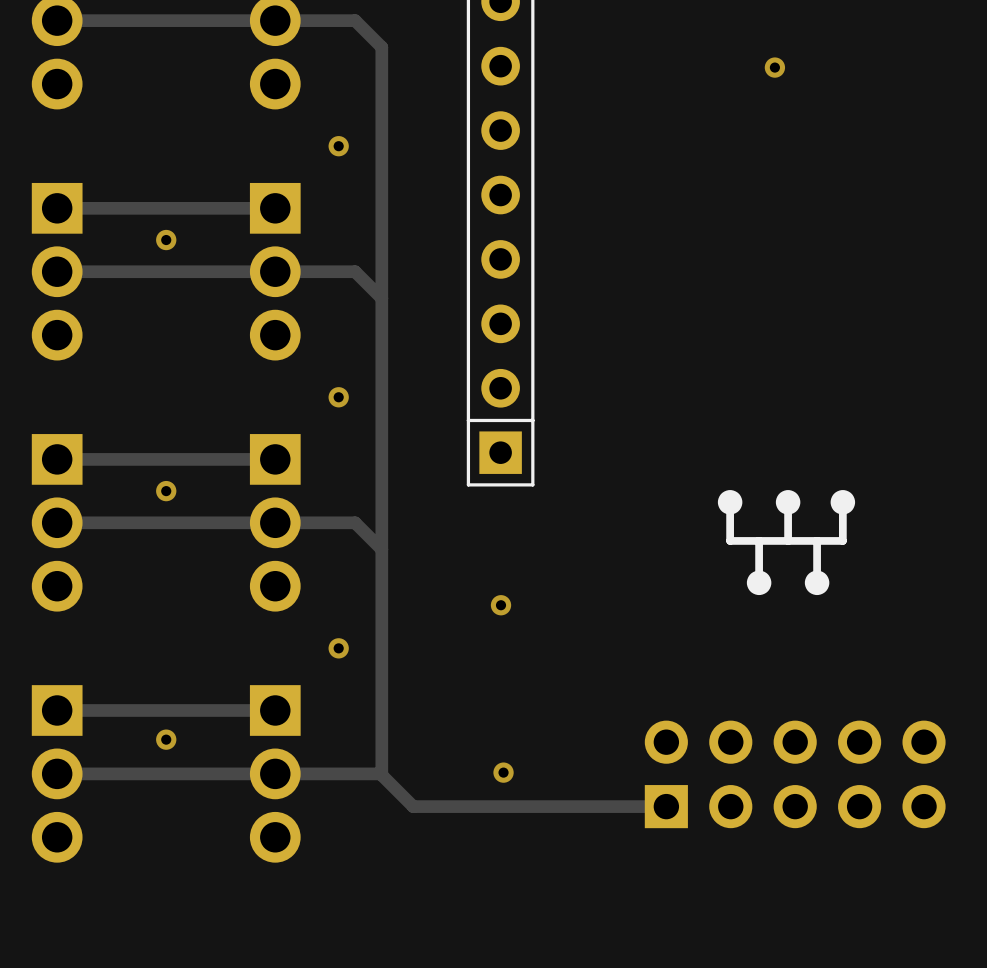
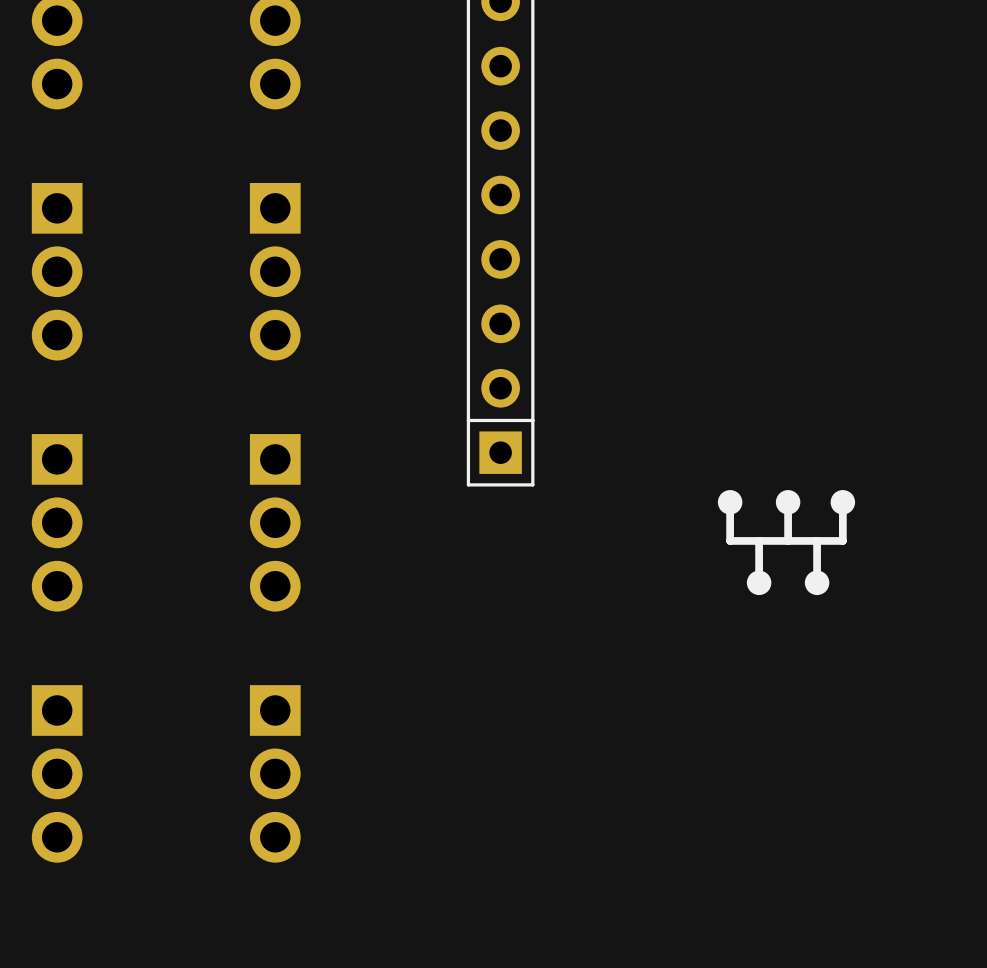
track: (57, 20) (355, 20) (381, 47) (381, 775) (413, 806) (666, 806) -> none
via: (774, 67) -> none
via: (338, 146) -> none
track: (275, 208) (57, 208) -> none
via: (166, 240) -> none
track: (57, 271) (355, 271) (381, 298) -> none
via: (338, 397) -> none
track: (275, 459) (57, 459) -> none
via: (166, 491) -> none
track: (57, 522) (355, 522) (381, 549) -> none
via: (501, 605) -> none
via: (338, 648) -> none
track: (275, 710) (57, 710) -> none
via: (166, 739) -> none
via: (503, 772) -> none
track: (380, 773) (57, 773) -> none
part: (795, 774) -> none

